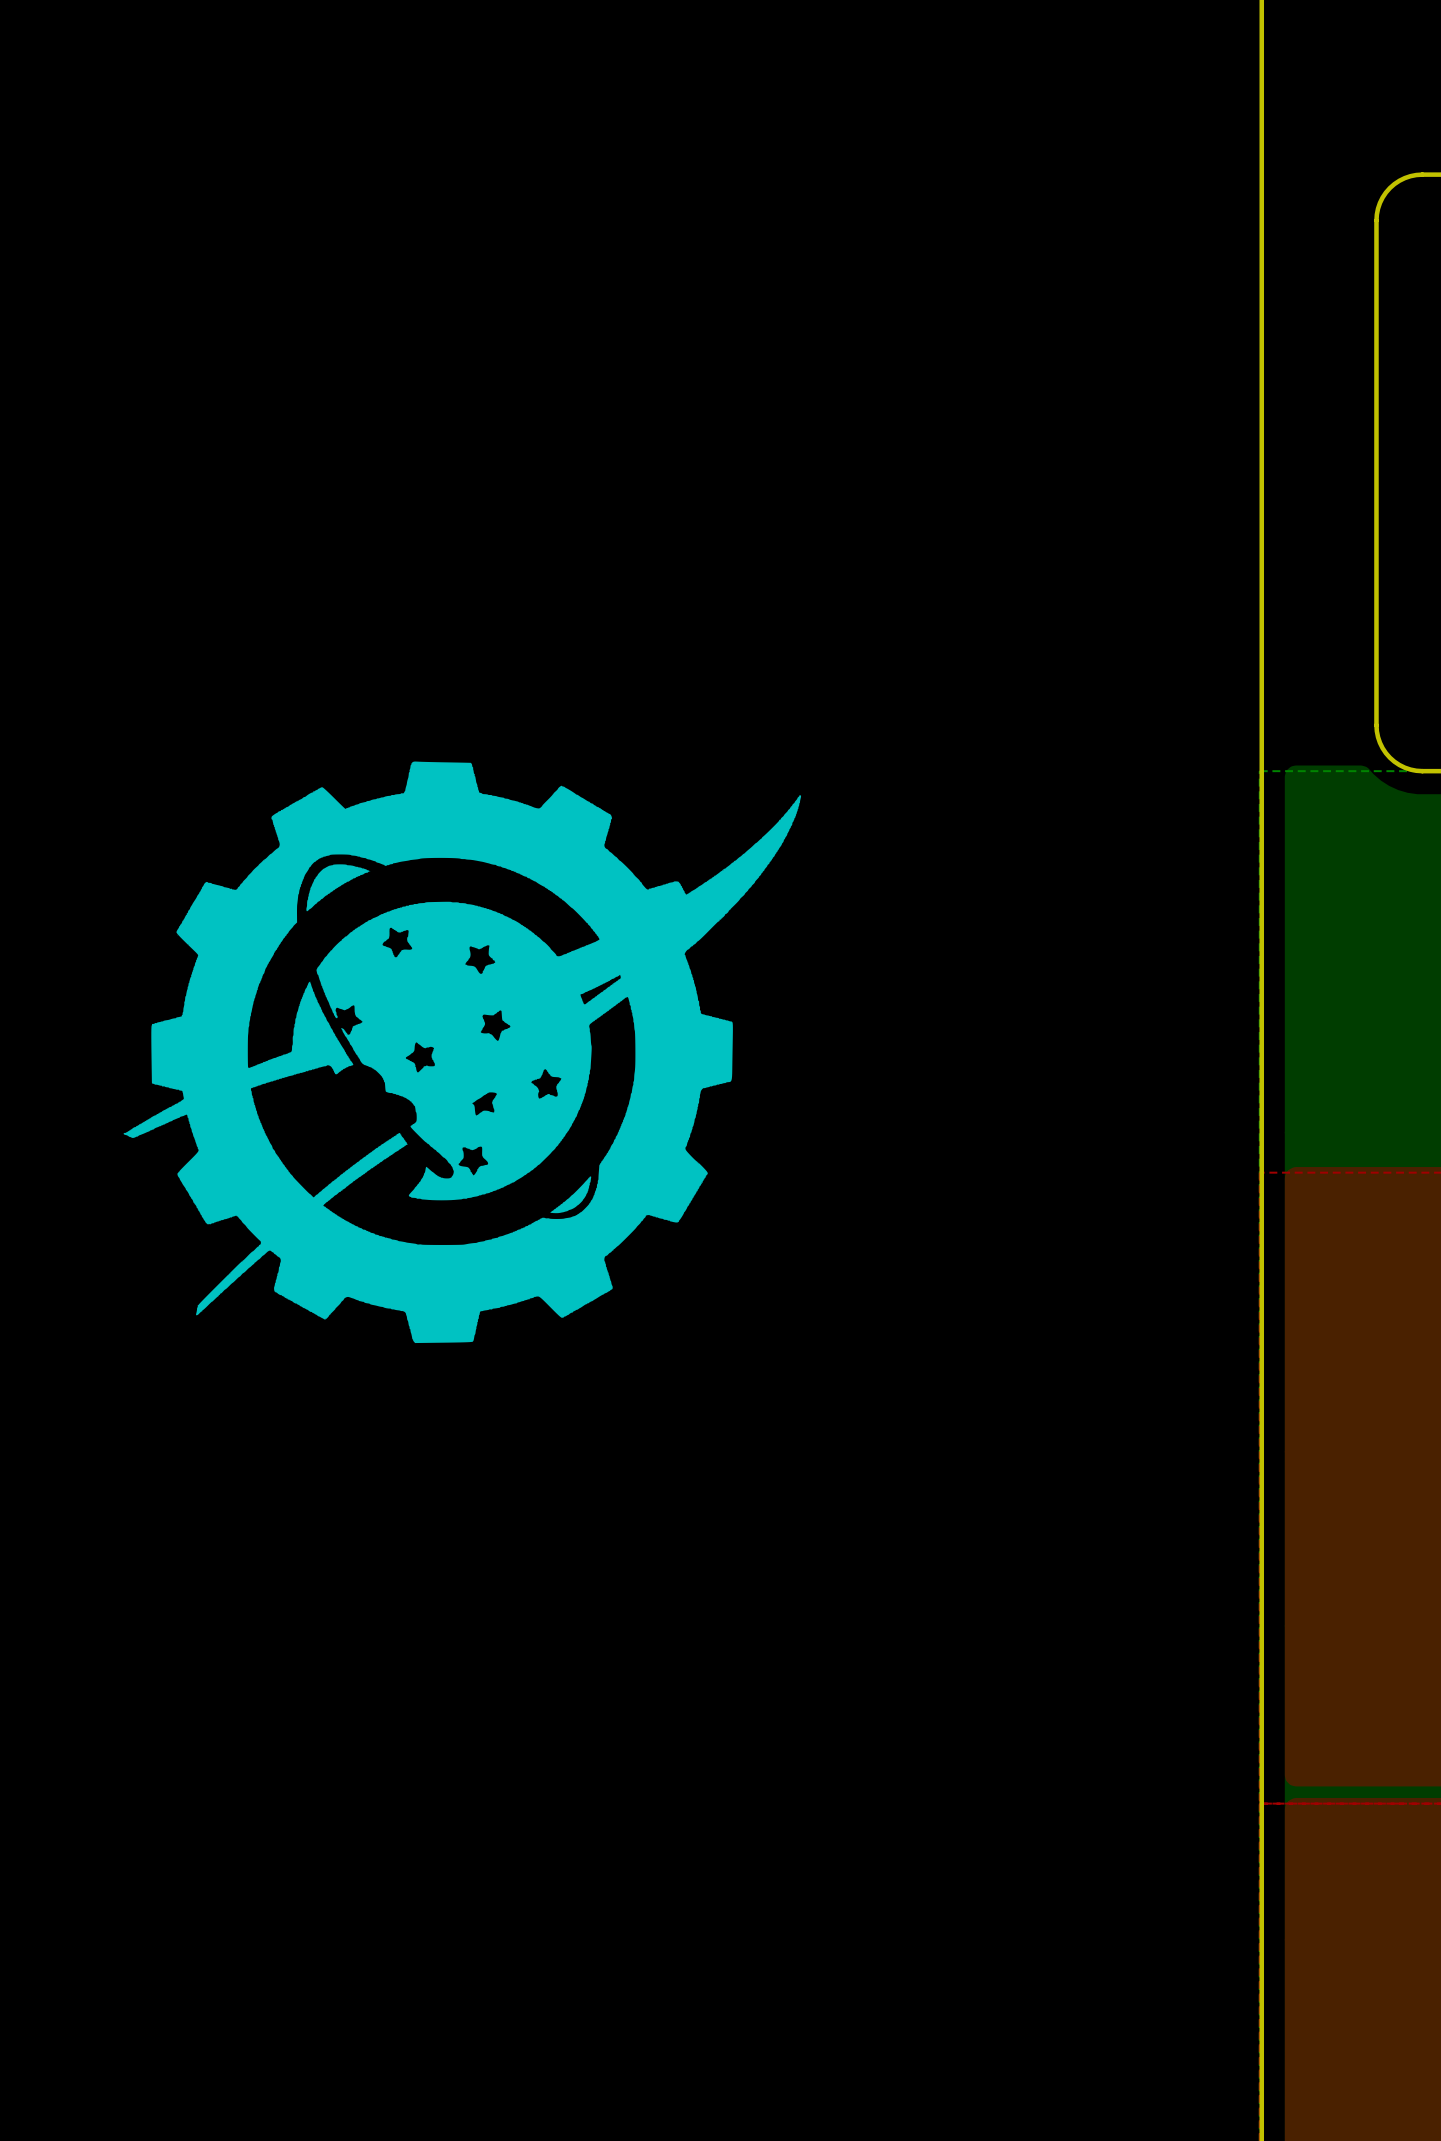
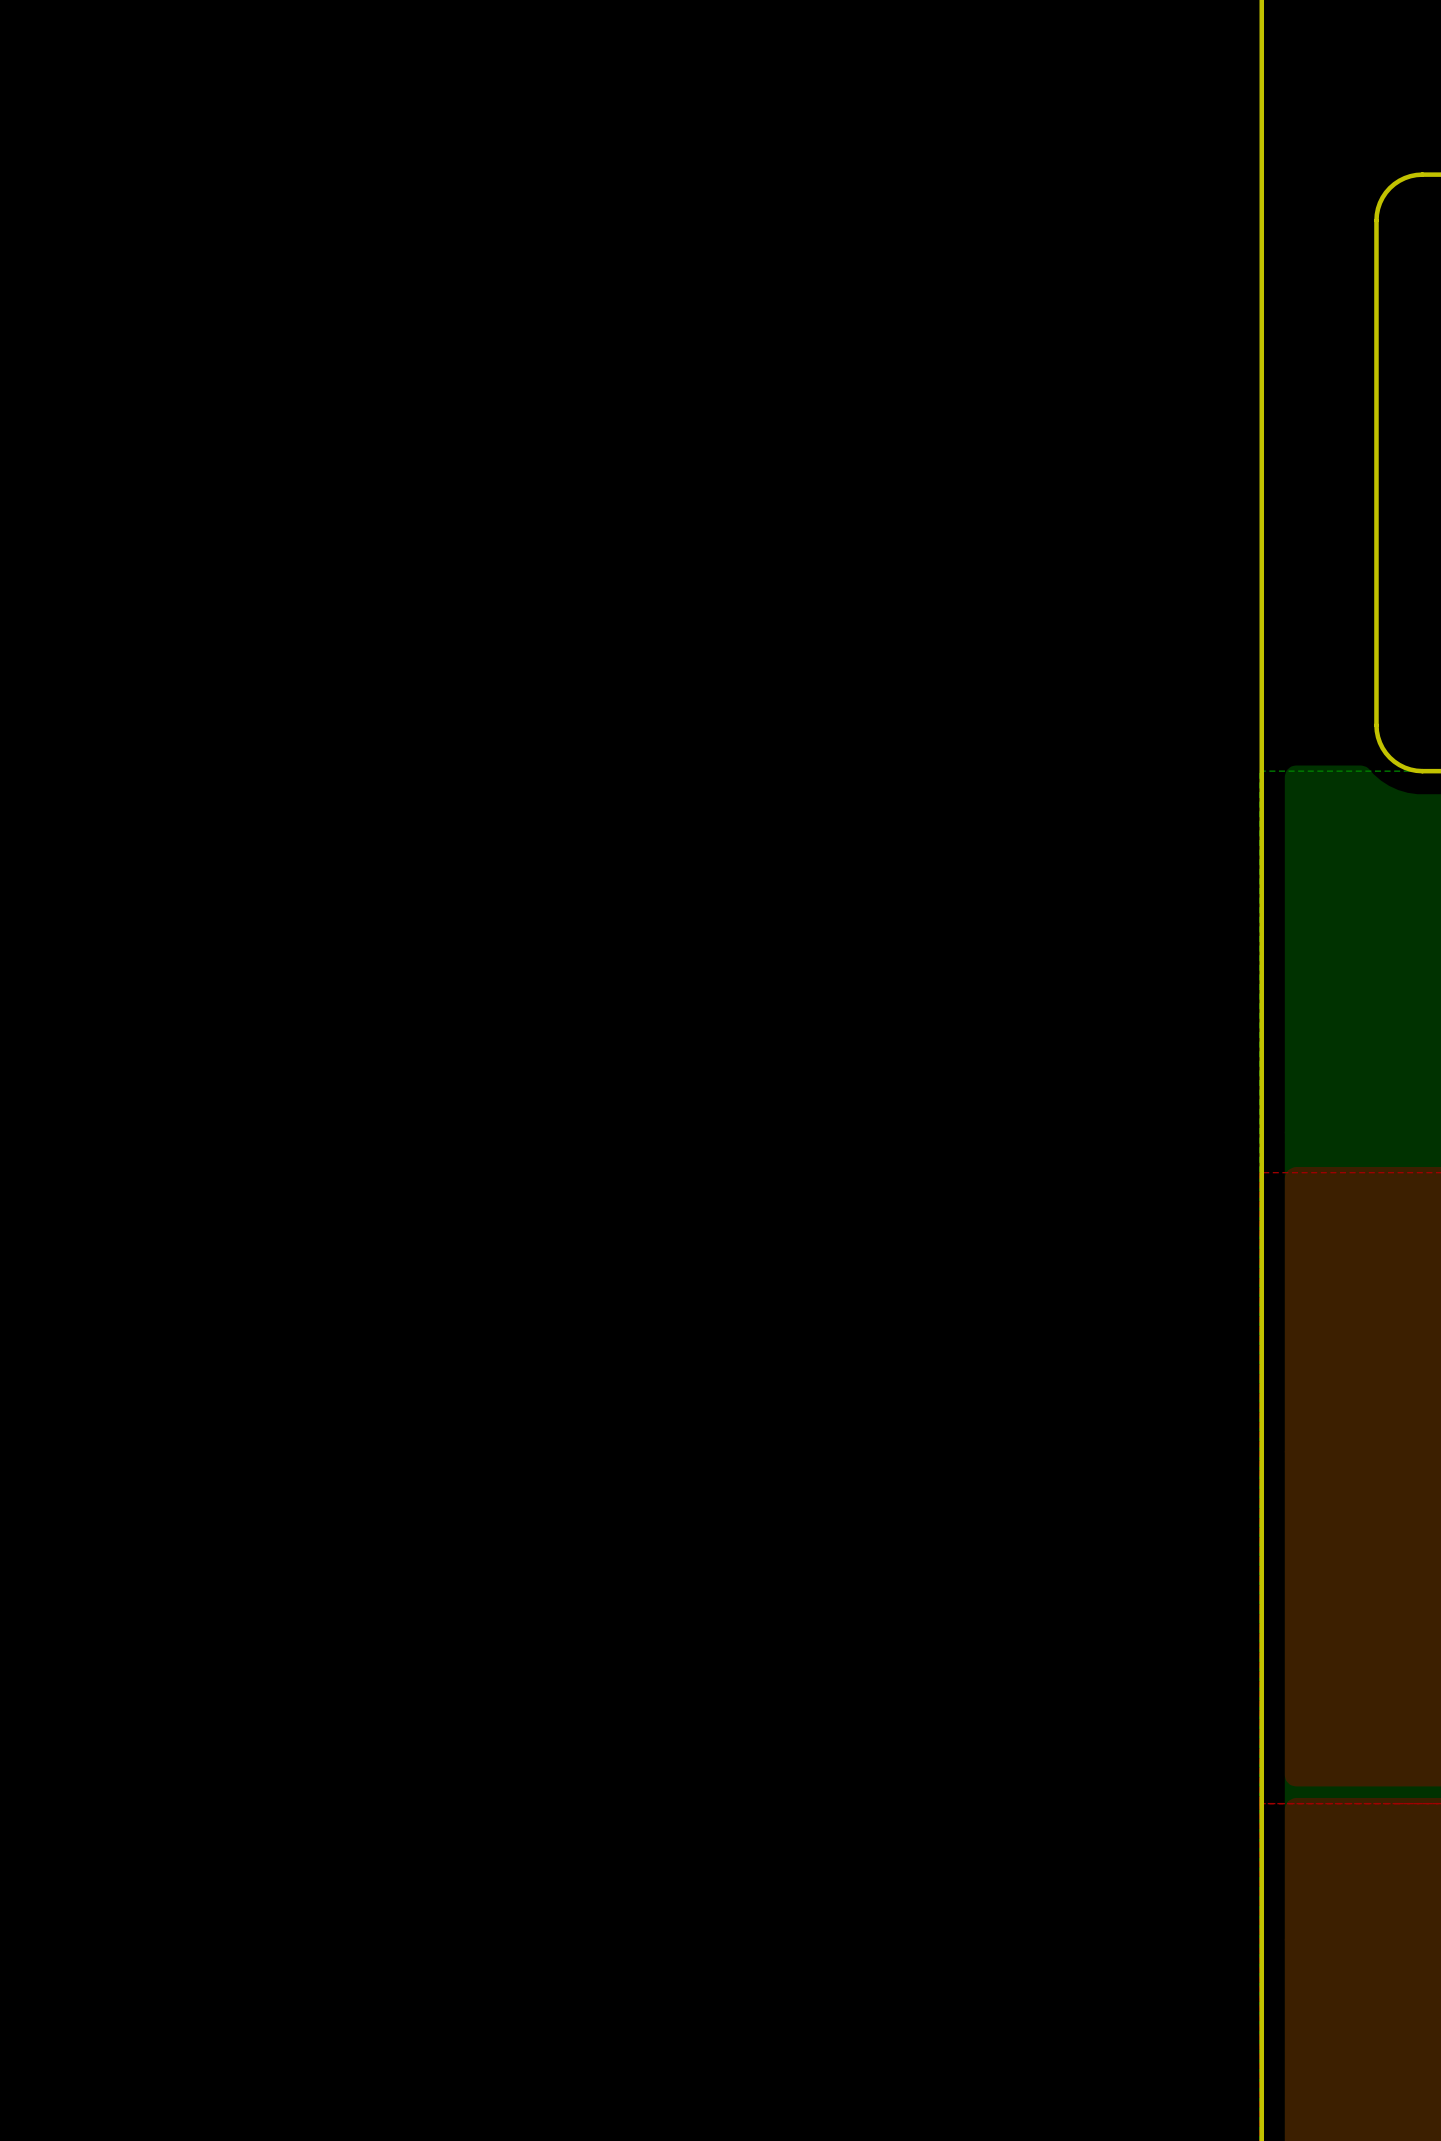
drawing: [123, 761, 802, 1344] -> none

